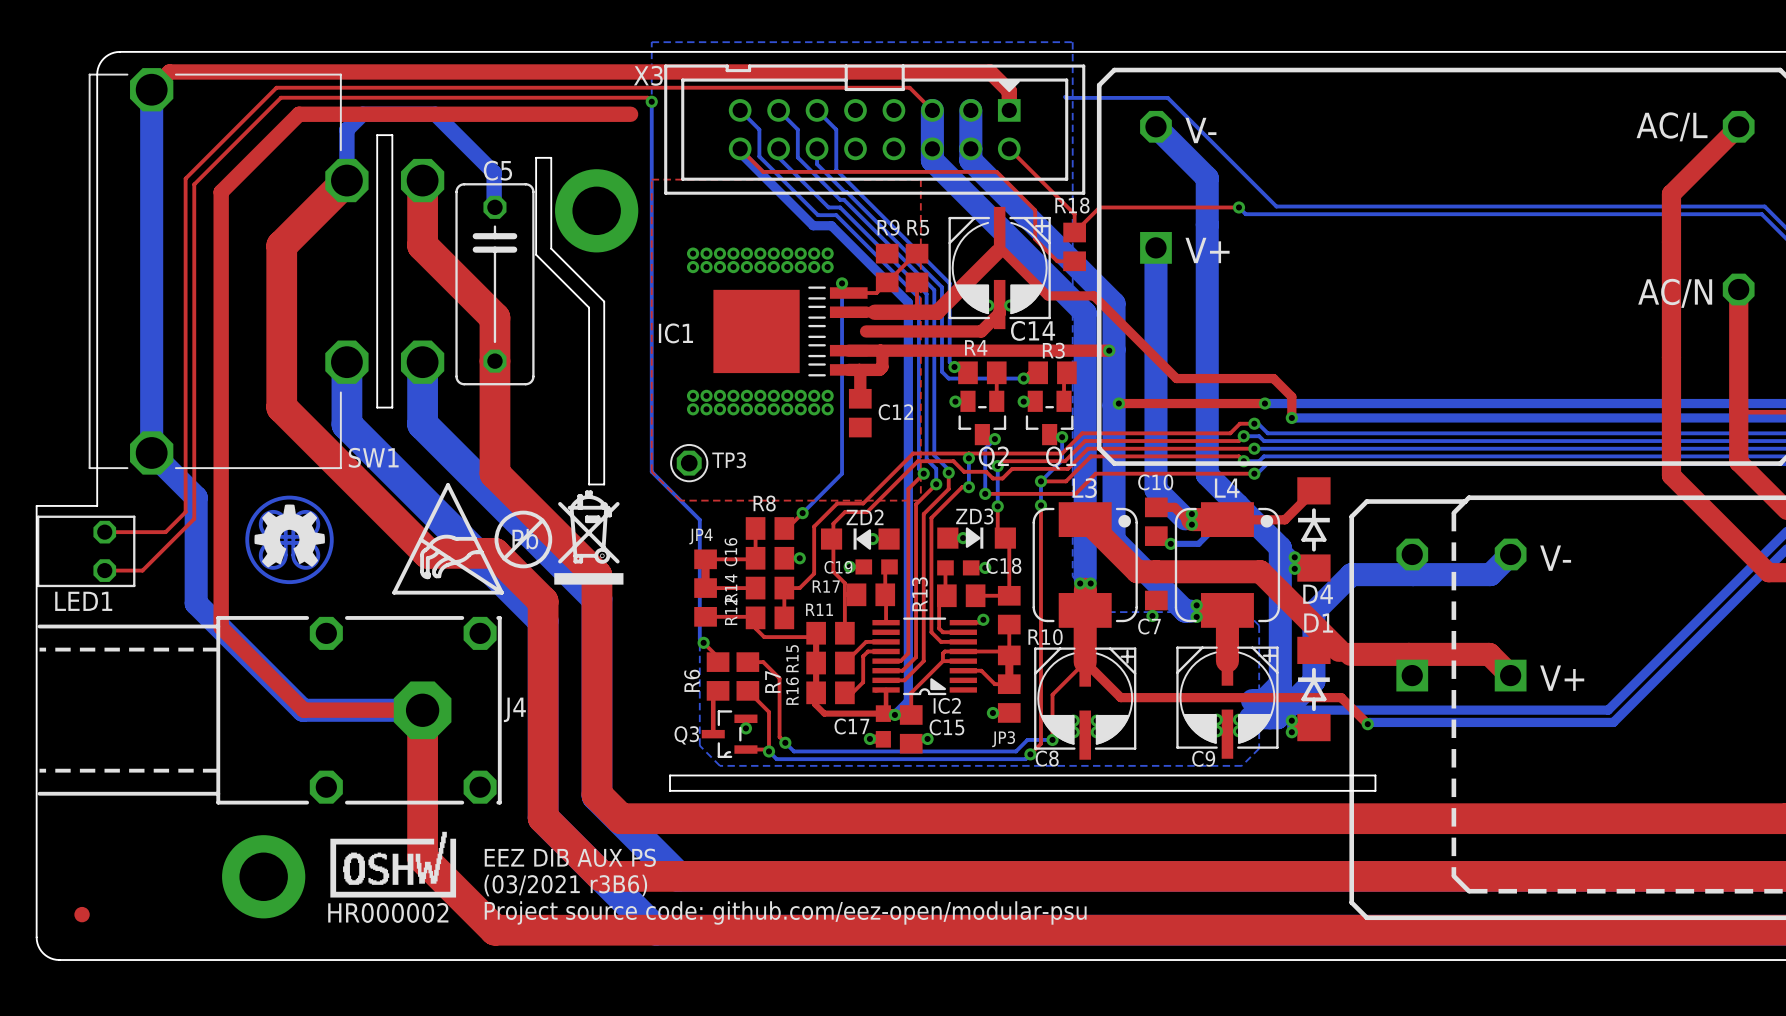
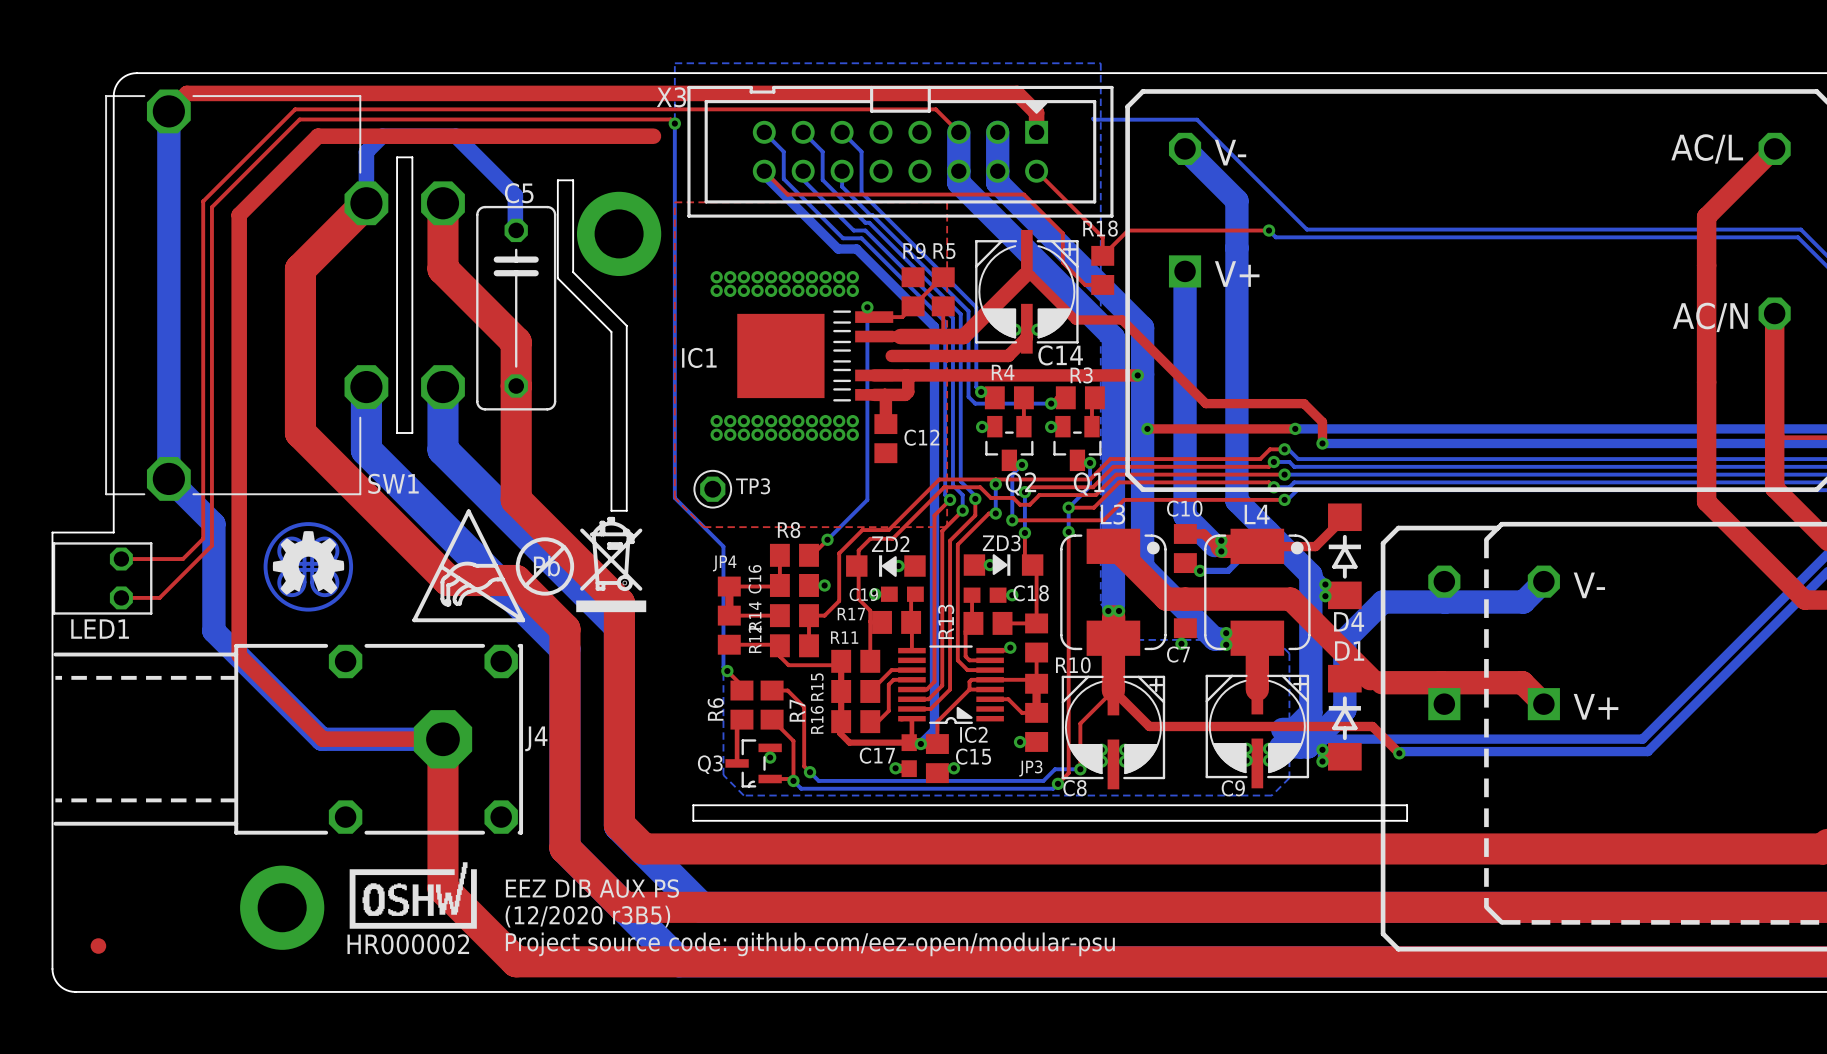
text: (03/2021 r3B6) (565, 885) -> (12/2020 r3B5) (587, 916)

